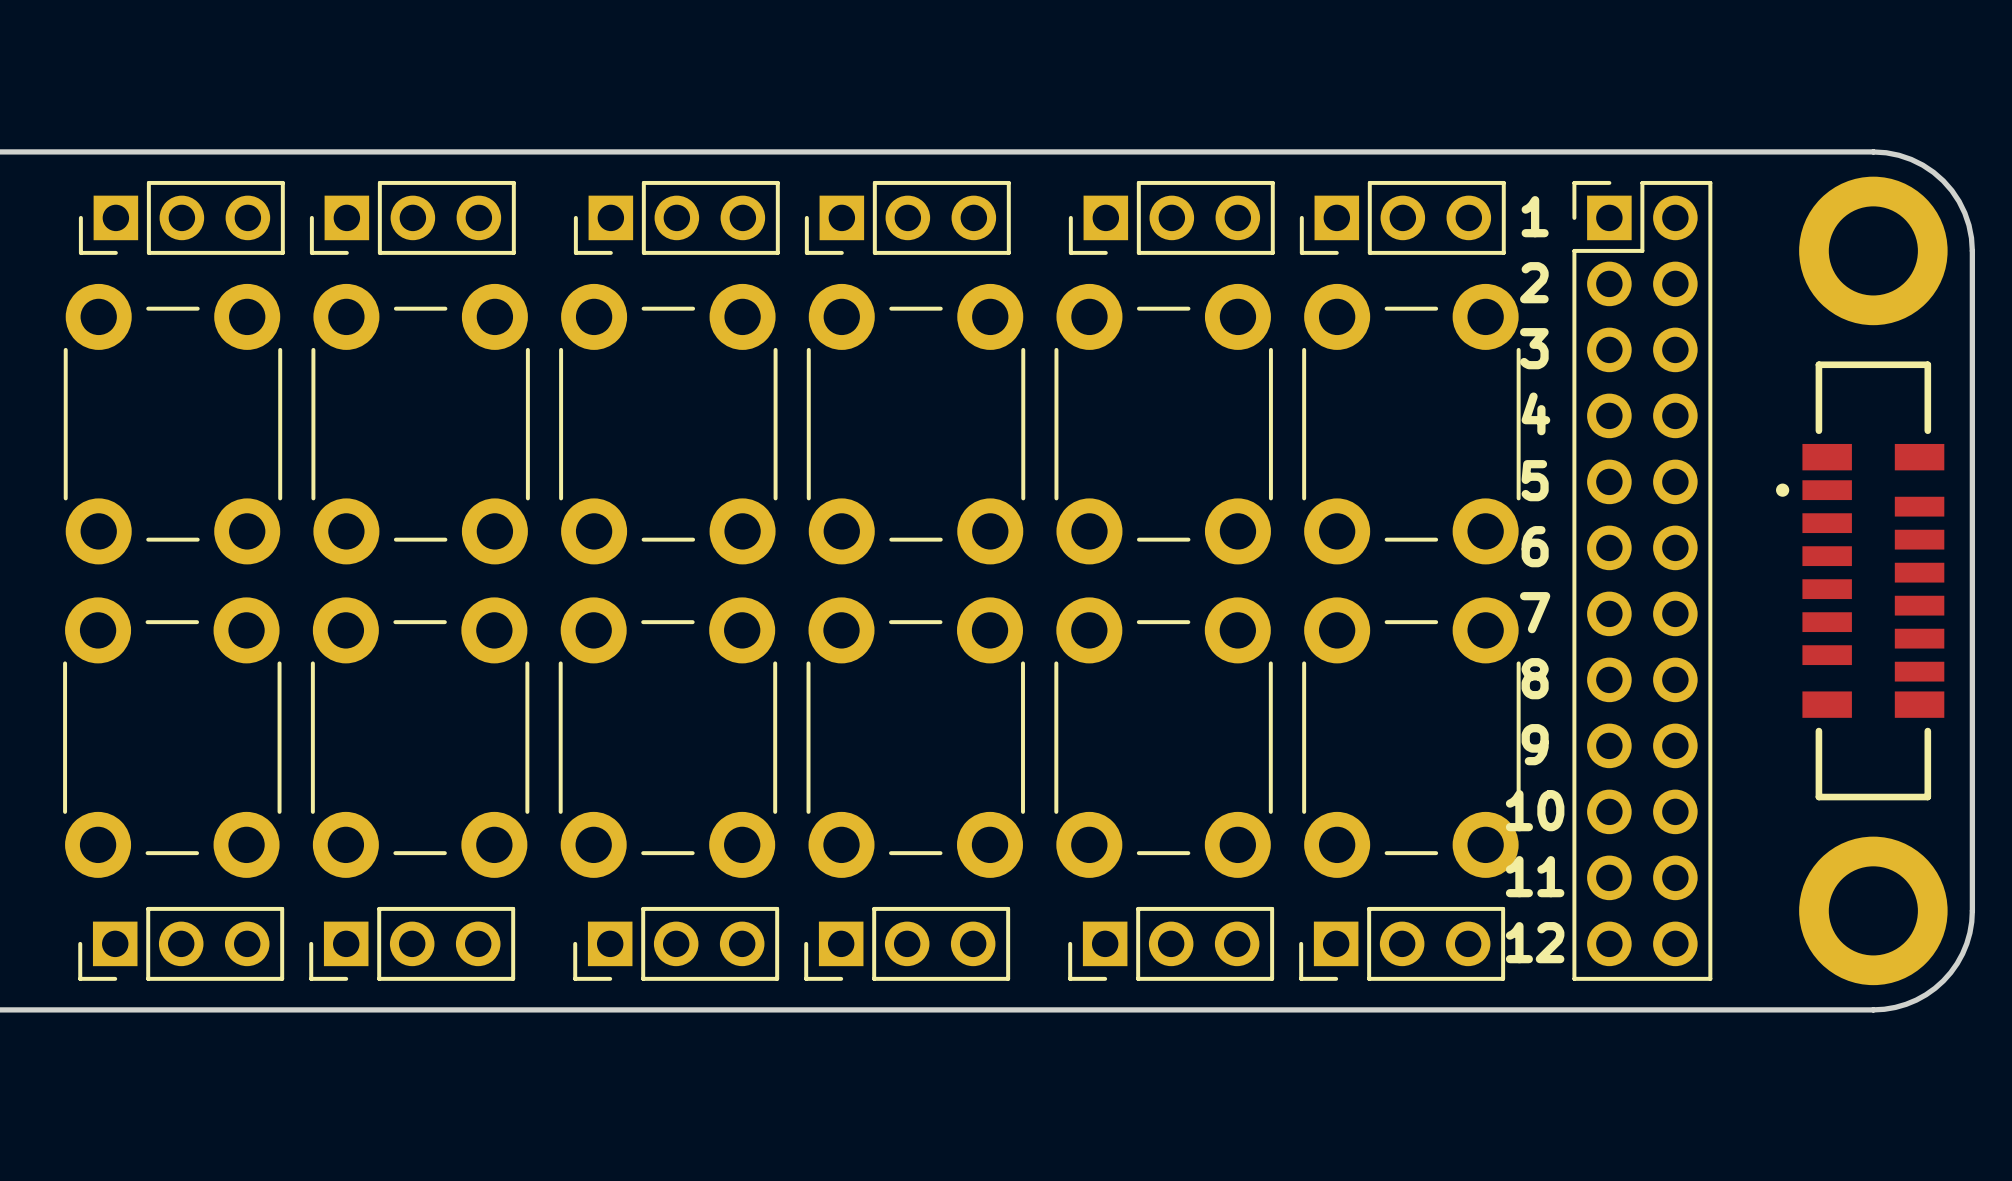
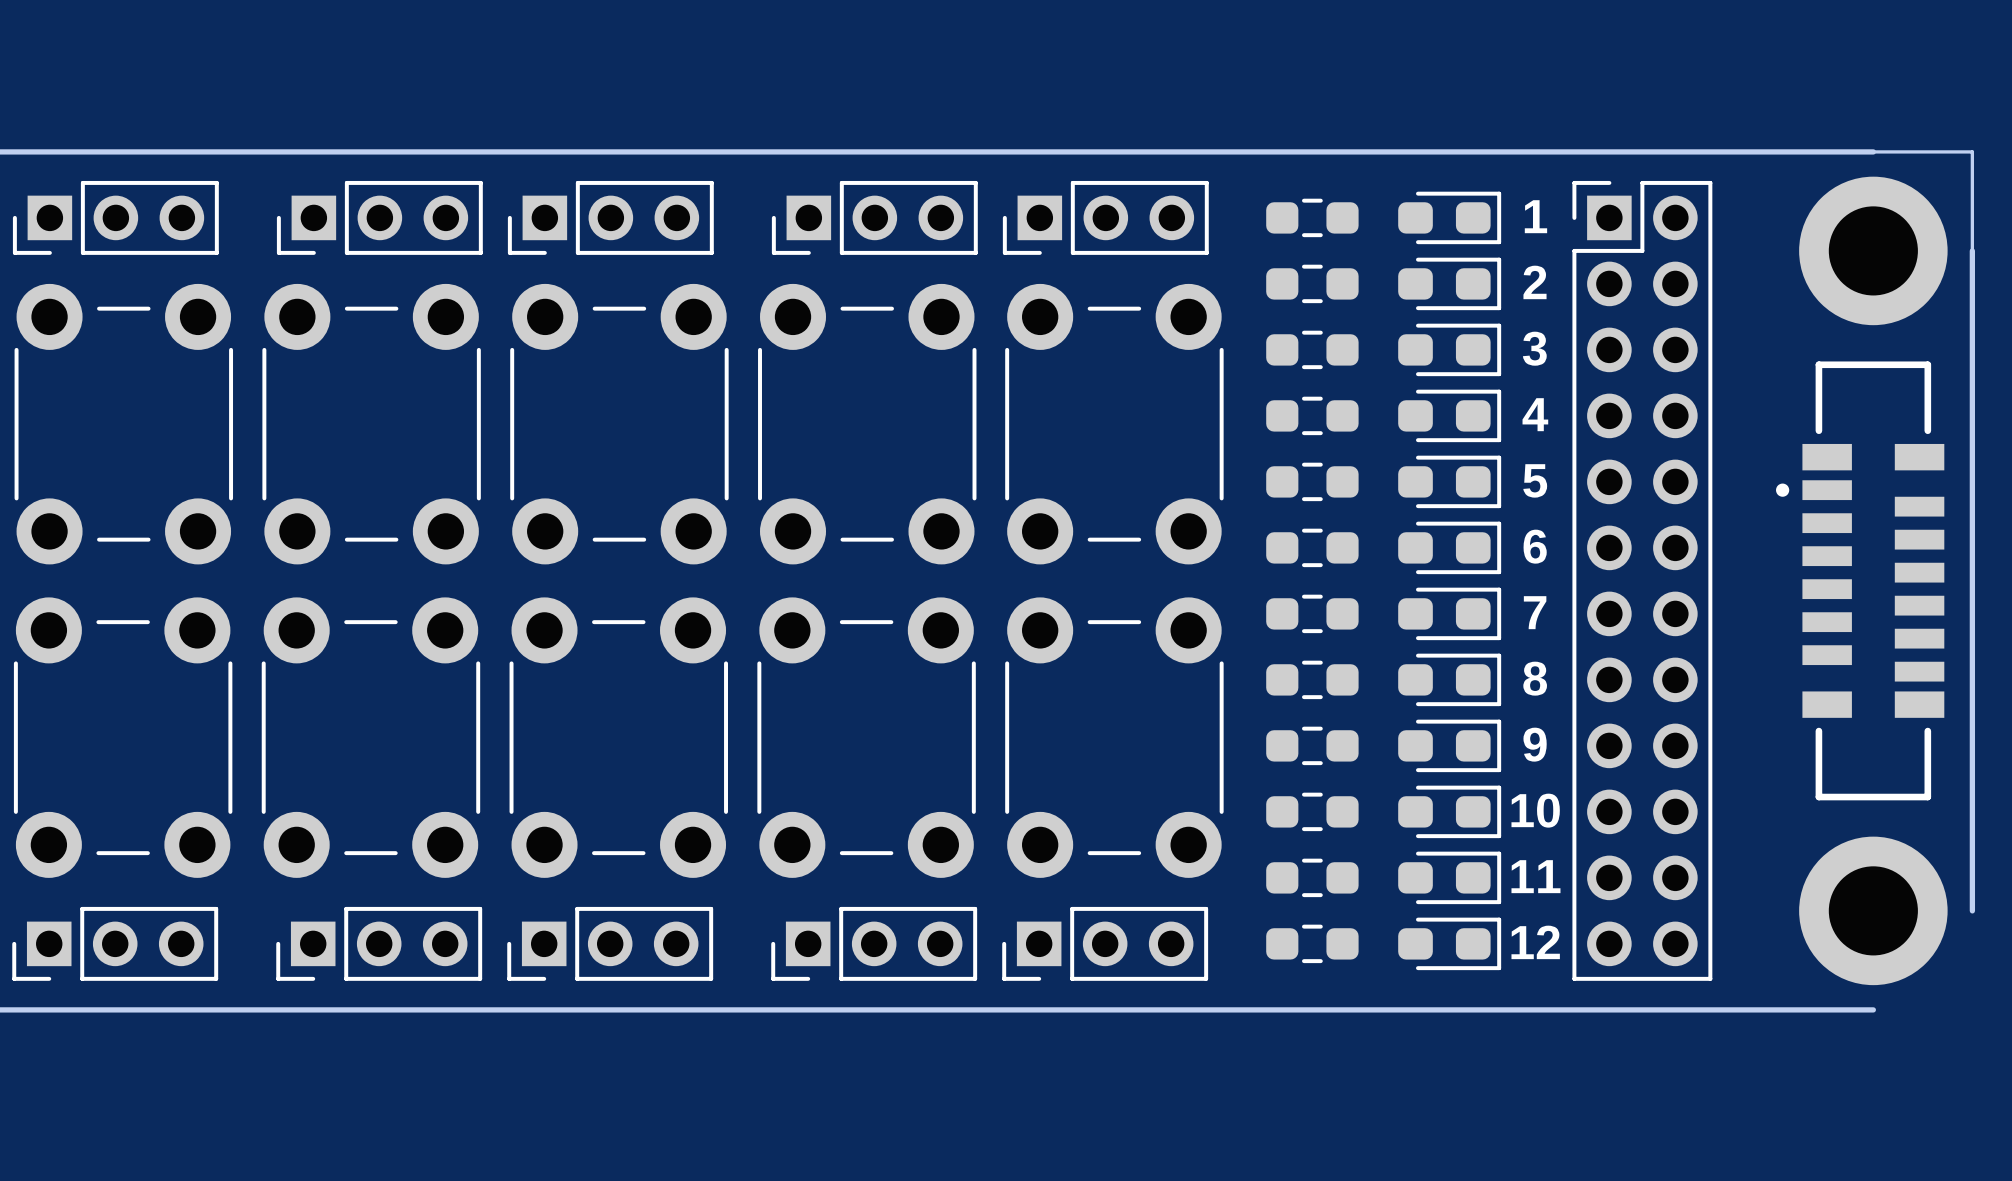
board edge: (1873, 151) (1886, 152) (1911, 159) (1922, 165) (1943, 180) (1959, 201) (1964, 213) (1968, 225) (1972, 250) -> (1873, 151) (1972, 151) (1972, 250)
part position: (181, 217) -> (115, 217)
part position: (412, 217) -> (379, 217)
part position: (676, 217) -> (610, 217)
part position: (907, 217) -> (874, 217)
part position: (1171, 217) -> (1105, 217)
part: none -> (1312, 217)
part: (1402, 217) -> none
part: none -> (1449, 217)
part: none -> (1312, 283)
part: none -> (1449, 283)
part: none -> (1312, 349)
part: none -> (1449, 349)
part: none -> (1312, 415)
part: none -> (1449, 415)
part position: (172, 424) -> (123, 424)
part position: (420, 424) -> (371, 424)
part position: (668, 424) -> (619, 424)
part position: (916, 424) -> (867, 424)
part position: (1163, 424) -> (1114, 424)
part: (1411, 424) -> none
part: none -> (1312, 481)
part: none -> (1449, 481)
part: none -> (1312, 547)
part: none -> (1449, 547)
part: none -> (1312, 613)
part: none -> (1449, 613)
part: none -> (1312, 679)
part: none -> (1449, 679)
part position: (172, 737) -> (123, 737)
part position: (420, 737) -> (370, 737)
part position: (667, 737) -> (618, 737)
part position: (915, 737) -> (866, 737)
part position: (1163, 737) -> (1114, 737)
part: (1411, 737) -> none
part: none -> (1312, 745)
part: none -> (1449, 745)
part: none -> (1312, 811)
part: none -> (1449, 811)
part: none -> (1312, 877)
part: none -> (1449, 877)
board edge: (1972, 910) (1969, 932) (1962, 953) (1943, 980) (1916, 1000) (1895, 1007) (1873, 1009) -> none
part position: (181, 943) -> (115, 943)
part position: (412, 943) -> (379, 943)
part position: (676, 943) -> (610, 943)
part position: (907, 943) -> (874, 943)
part position: (1171, 943) -> (1105, 943)
part: none -> (1312, 943)
part: (1402, 943) -> none
part: none -> (1449, 943)

